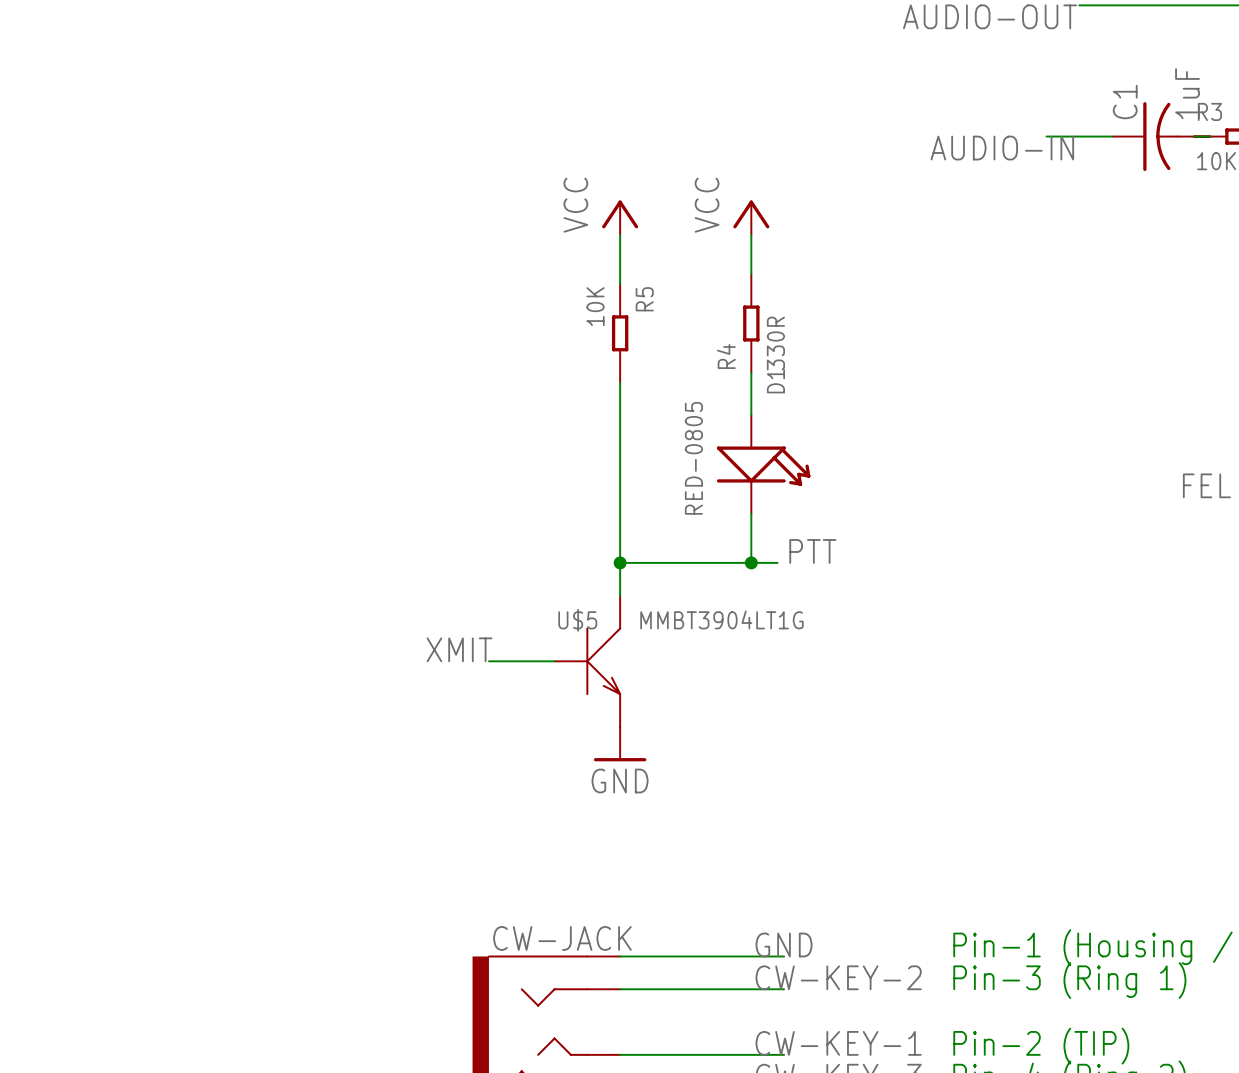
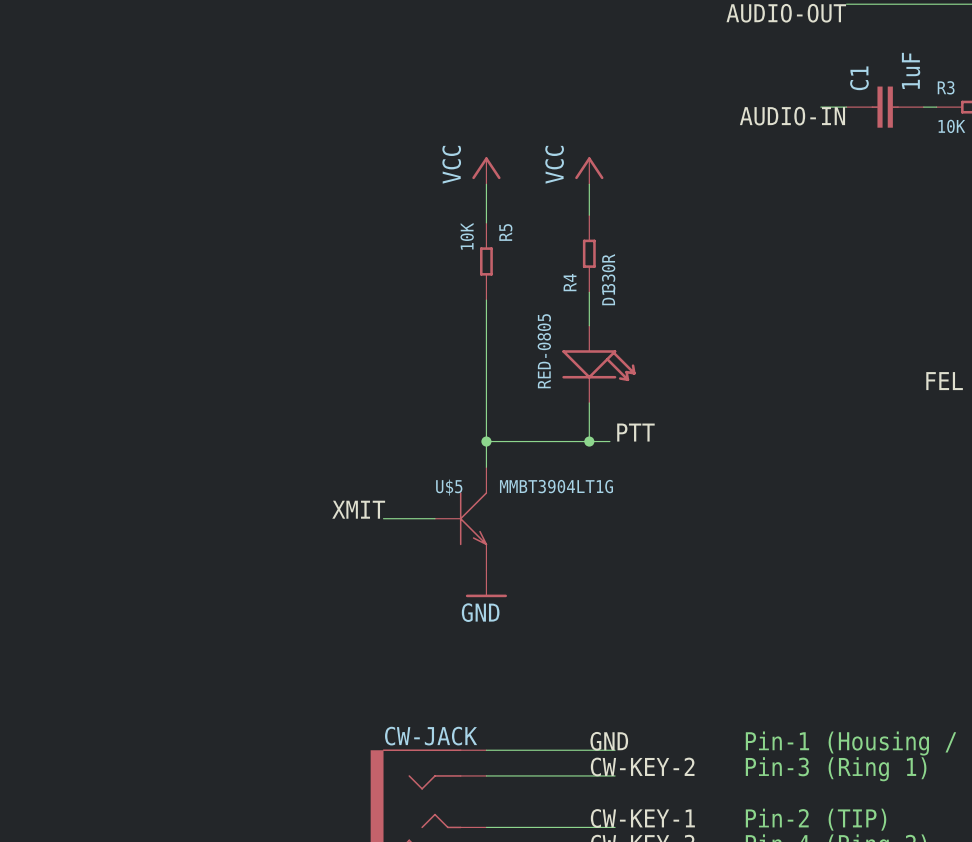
C1 symbol: [1112, 102, 1211, 172] -> [846, 86, 924, 128]

